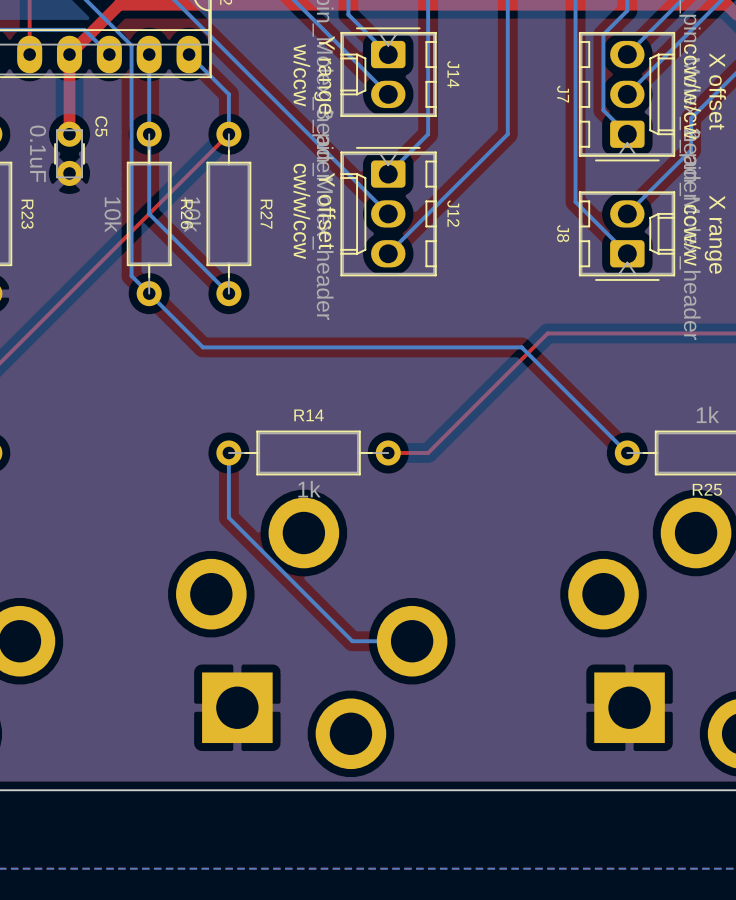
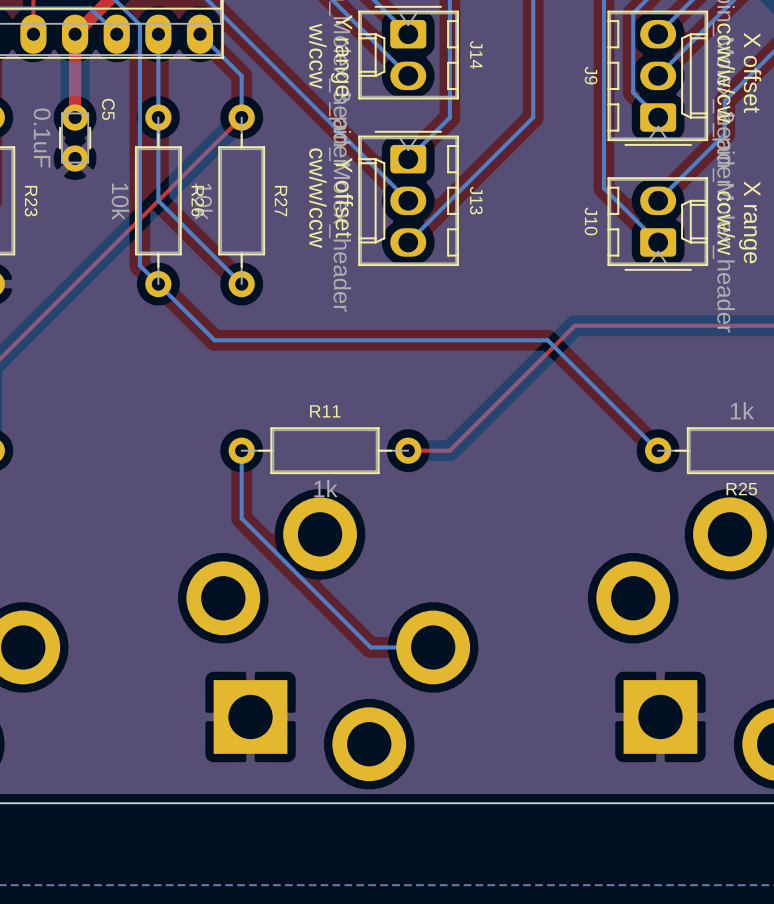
J7 name: J7 (563, 94) -> J9 (591, 75)
J12 name: J12 (453, 213) -> J13 (476, 200)
J8 name: J8 (563, 233) -> J10 (591, 221)
R14 name: R14 (309, 415) -> R11 (325, 411)

